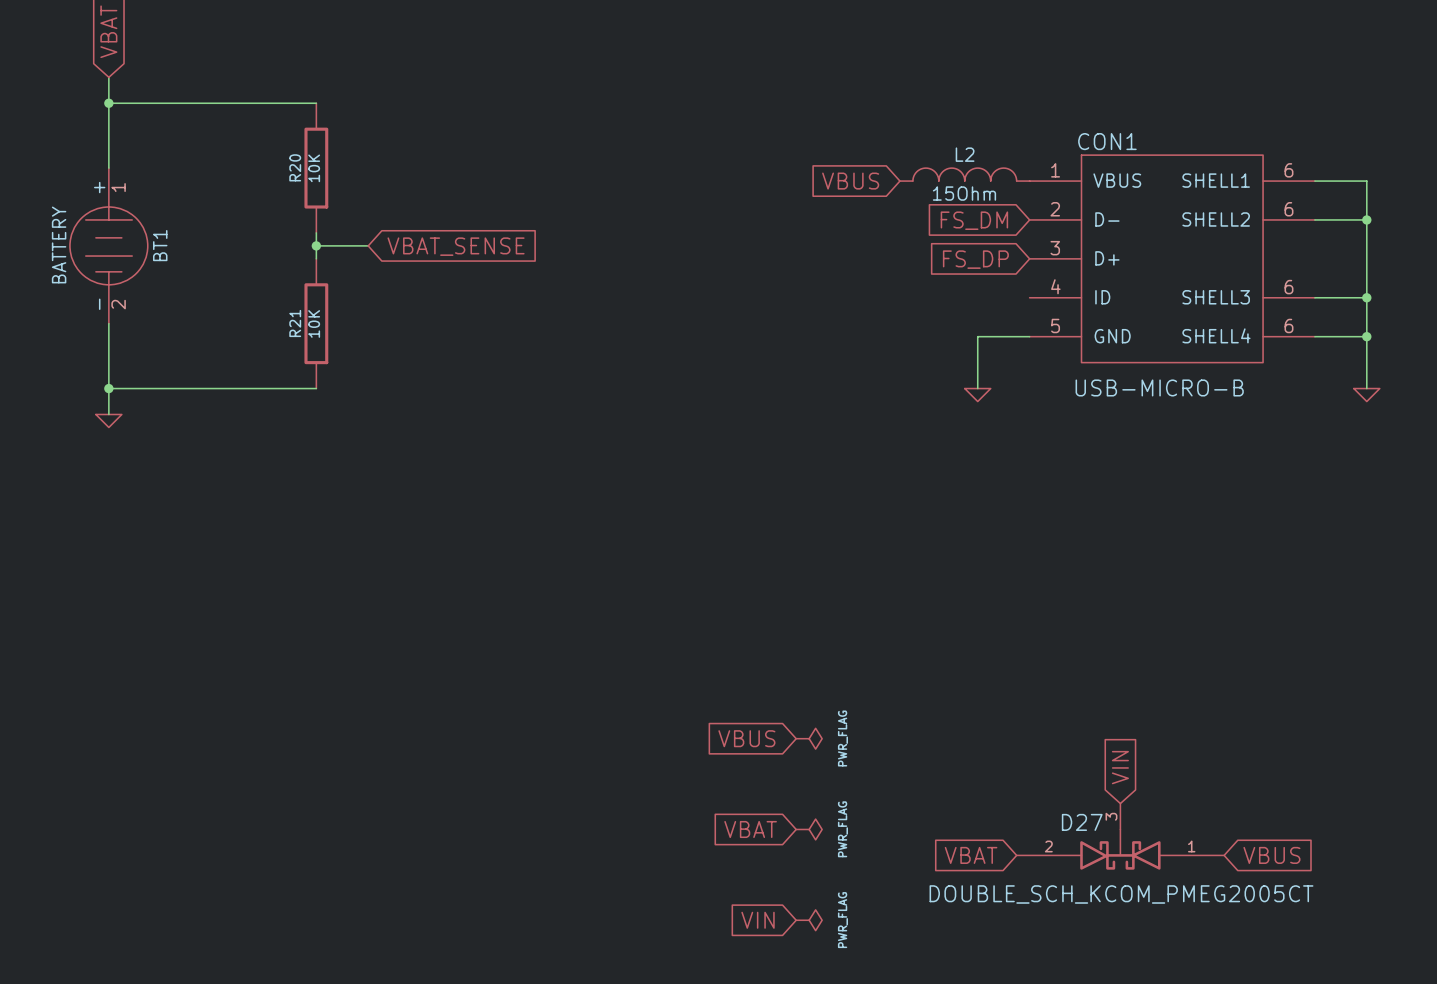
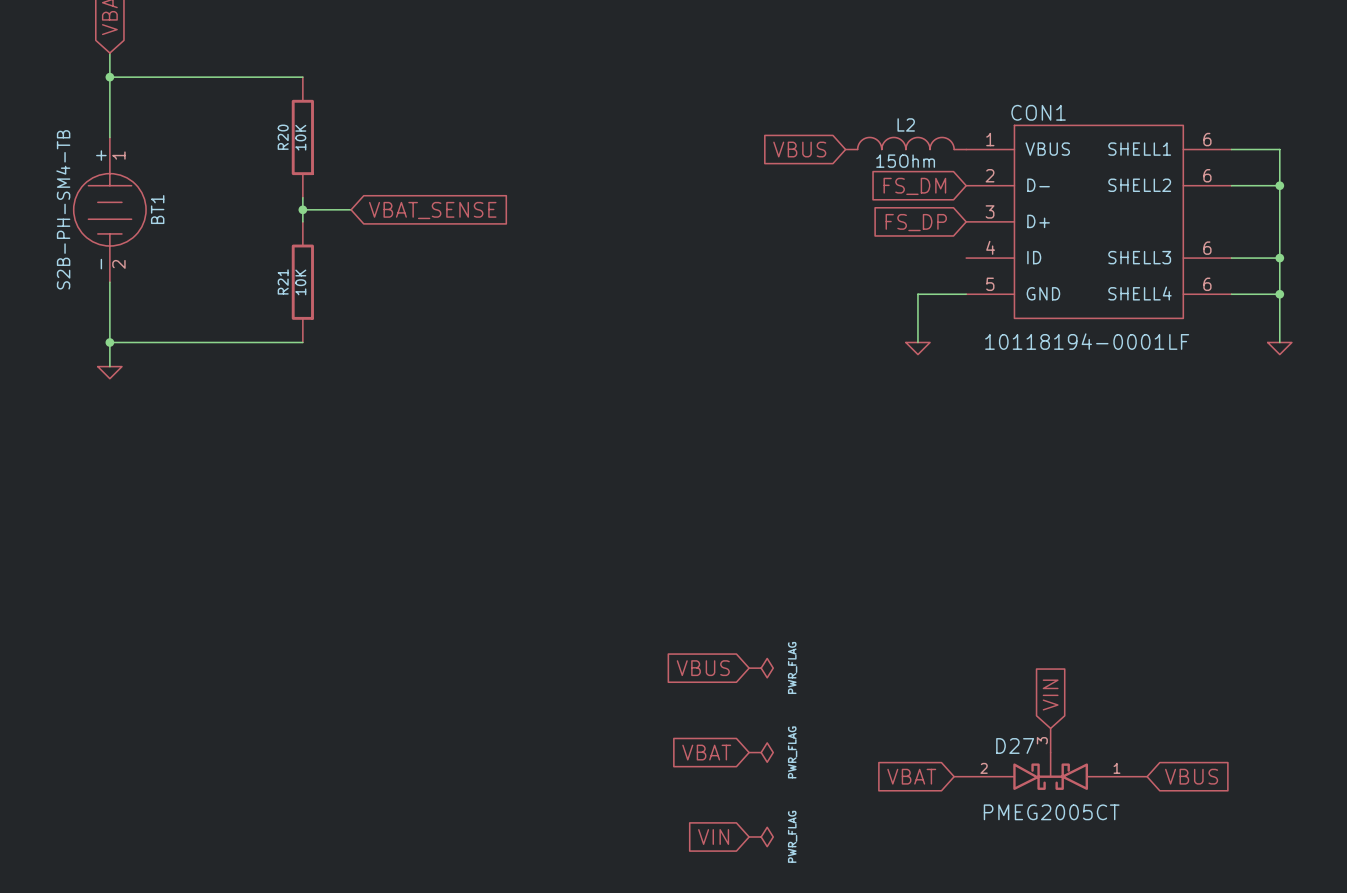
BT1 value: BATTERY (59, 244) -> S2B-PH-SM4-TB (63, 209)
CON1 value: USB-MICRO-B (1159, 387) -> 10118194-0001LF (1087, 341)
D27 value: DOUBLE_SCH_KCOM_PMEG2005CT (1121, 894) -> PMEG2005CT (1051, 812)

